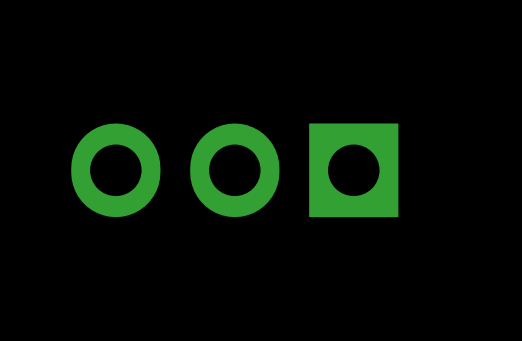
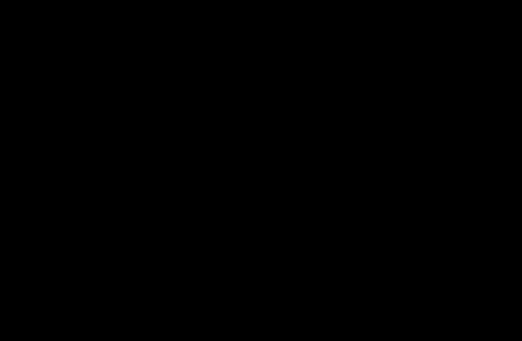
part: (234, 170) -> none

